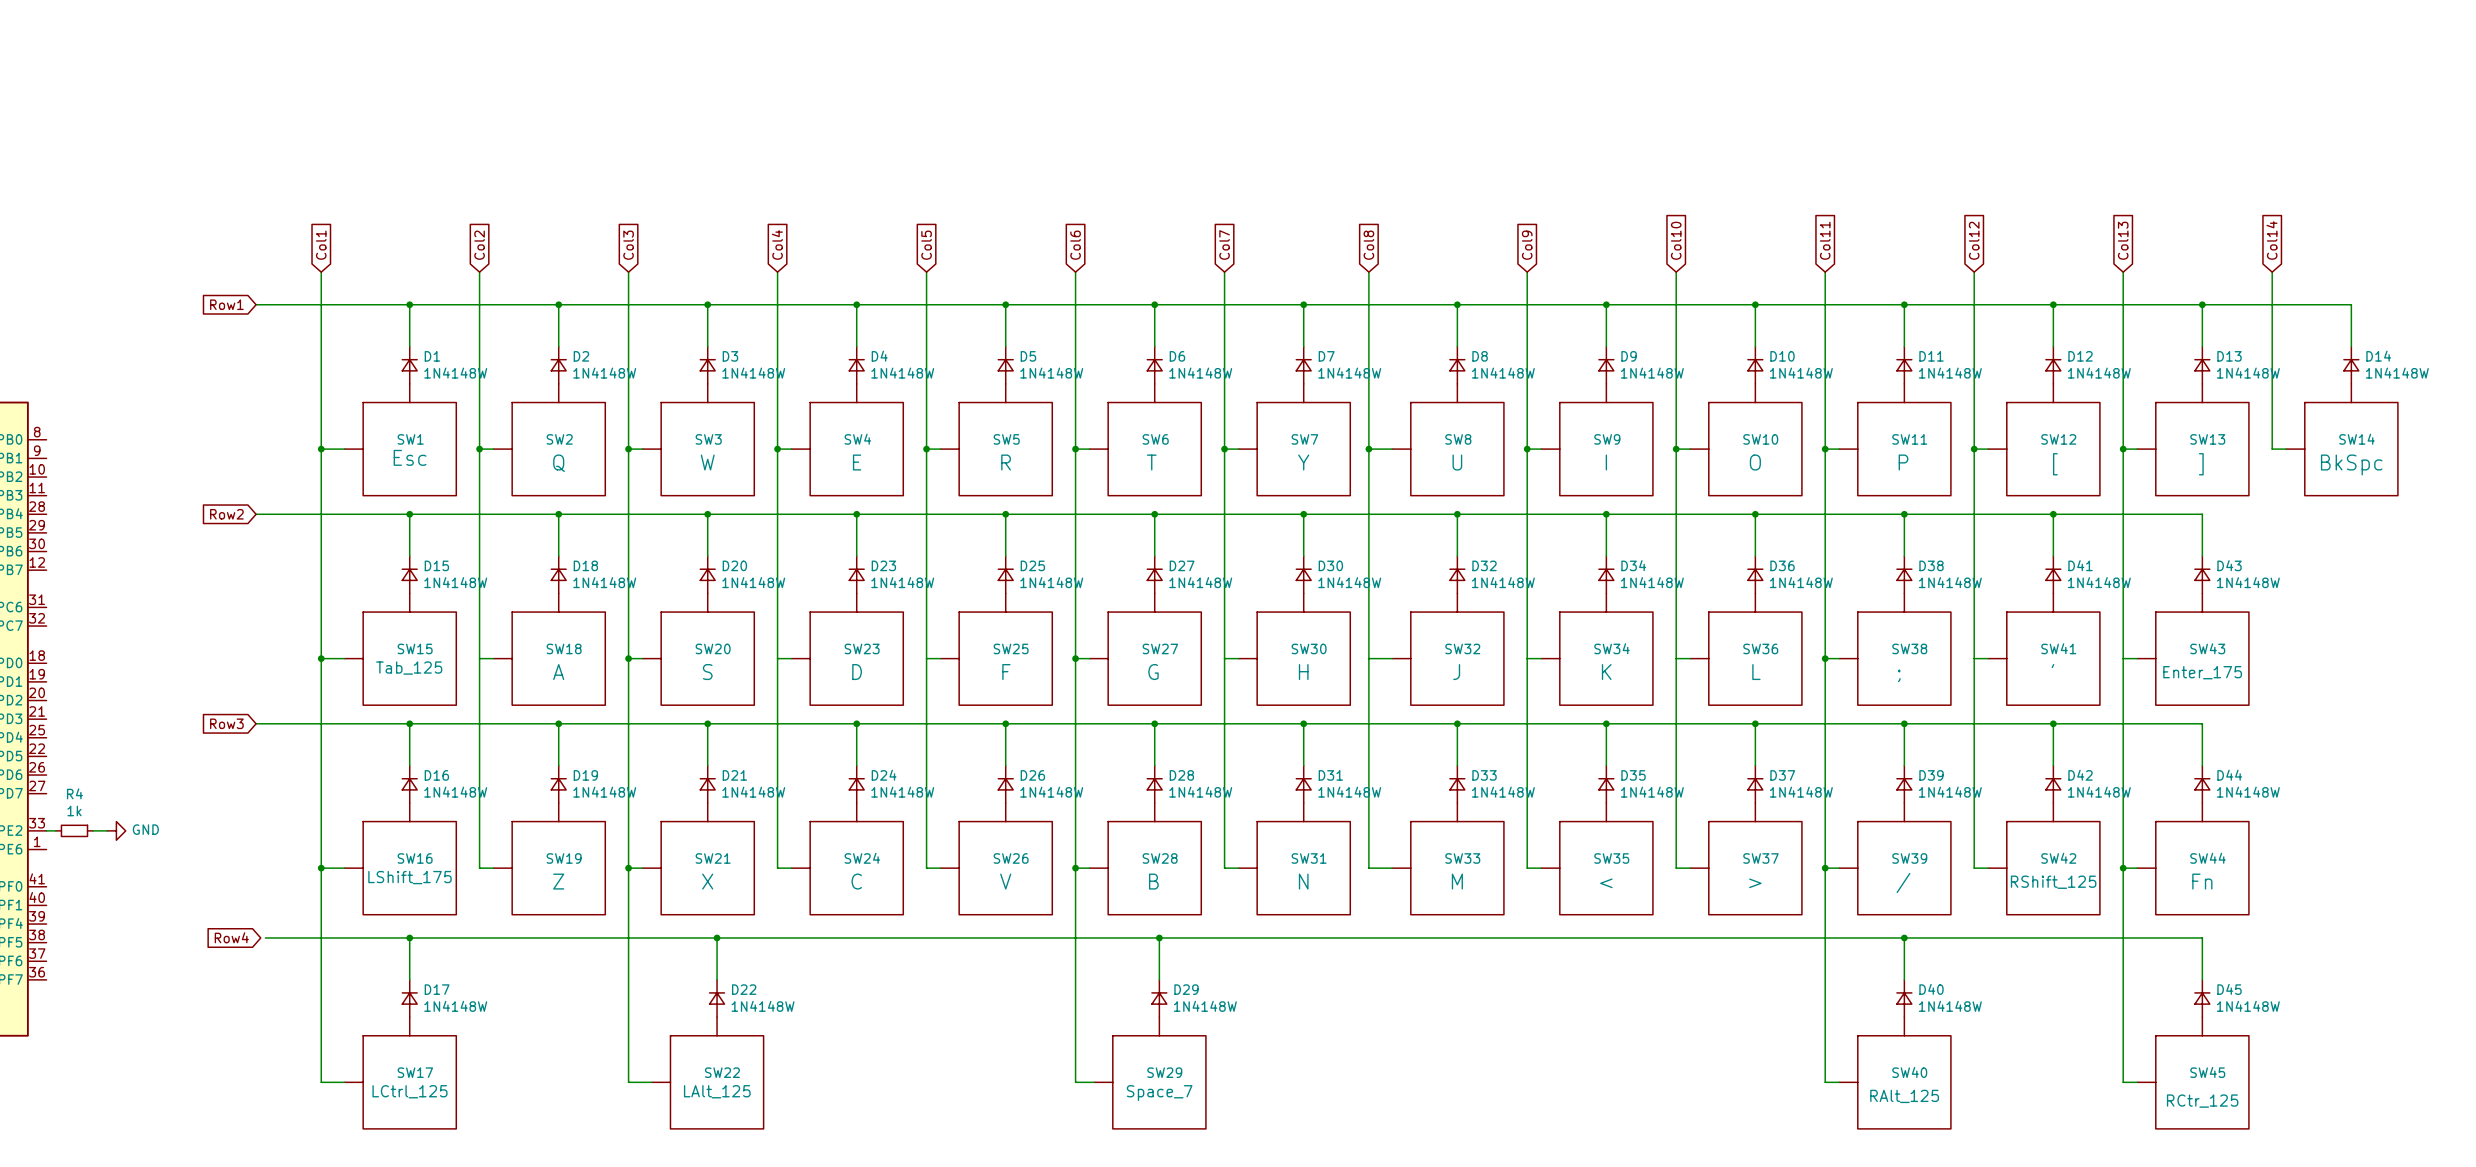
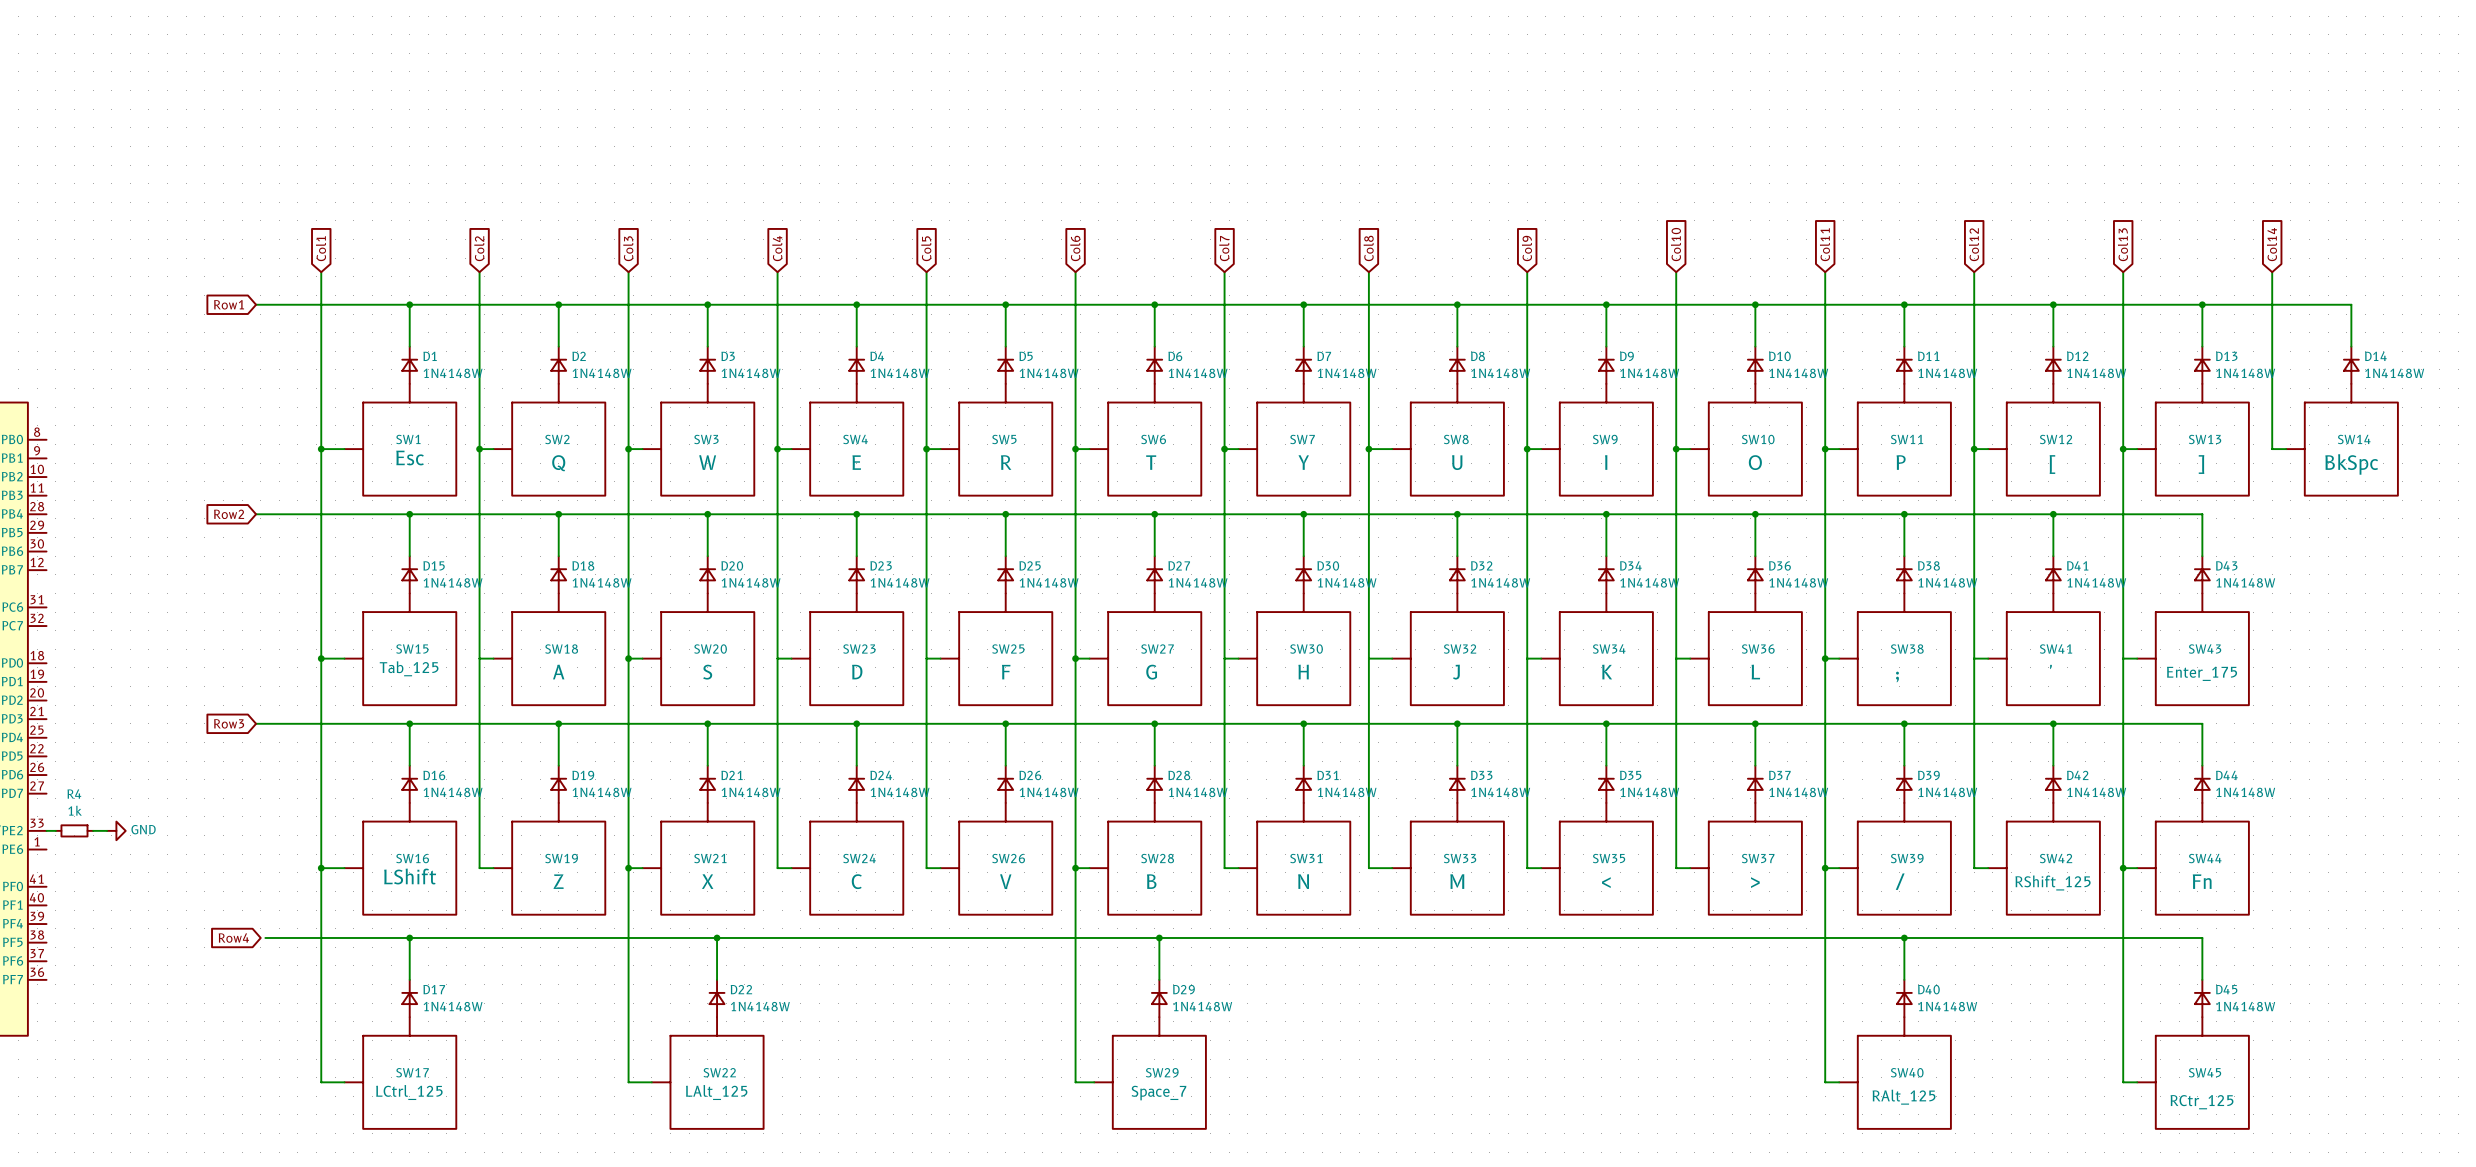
SW16 value: LShift_175 (409, 877) -> LShift (410, 876)

